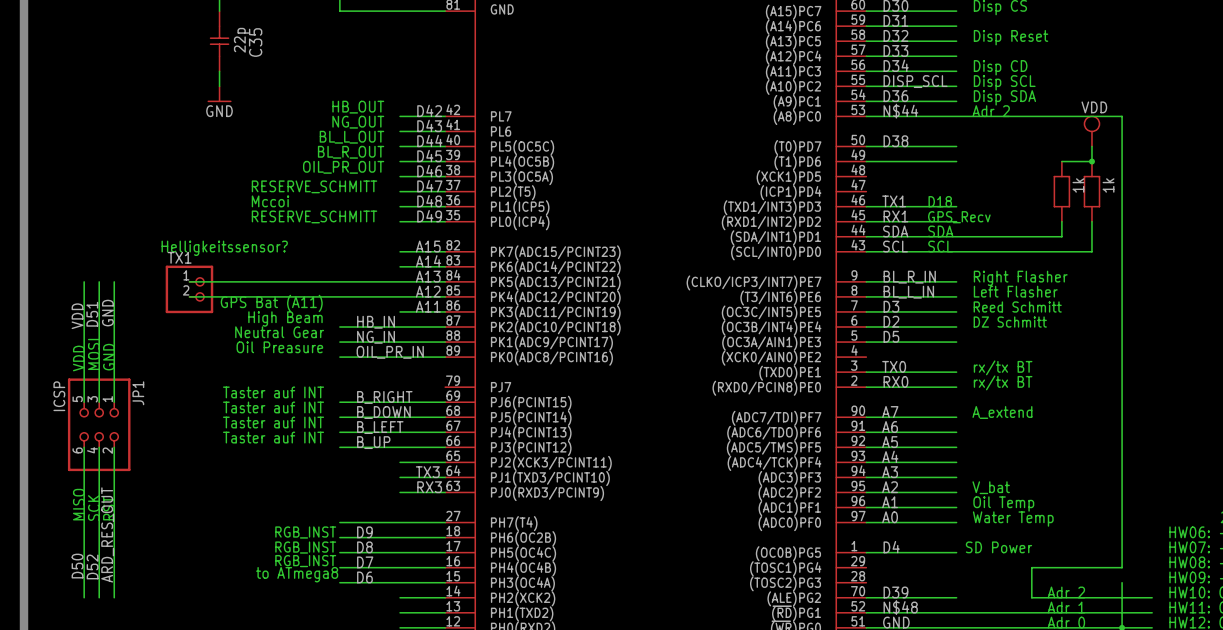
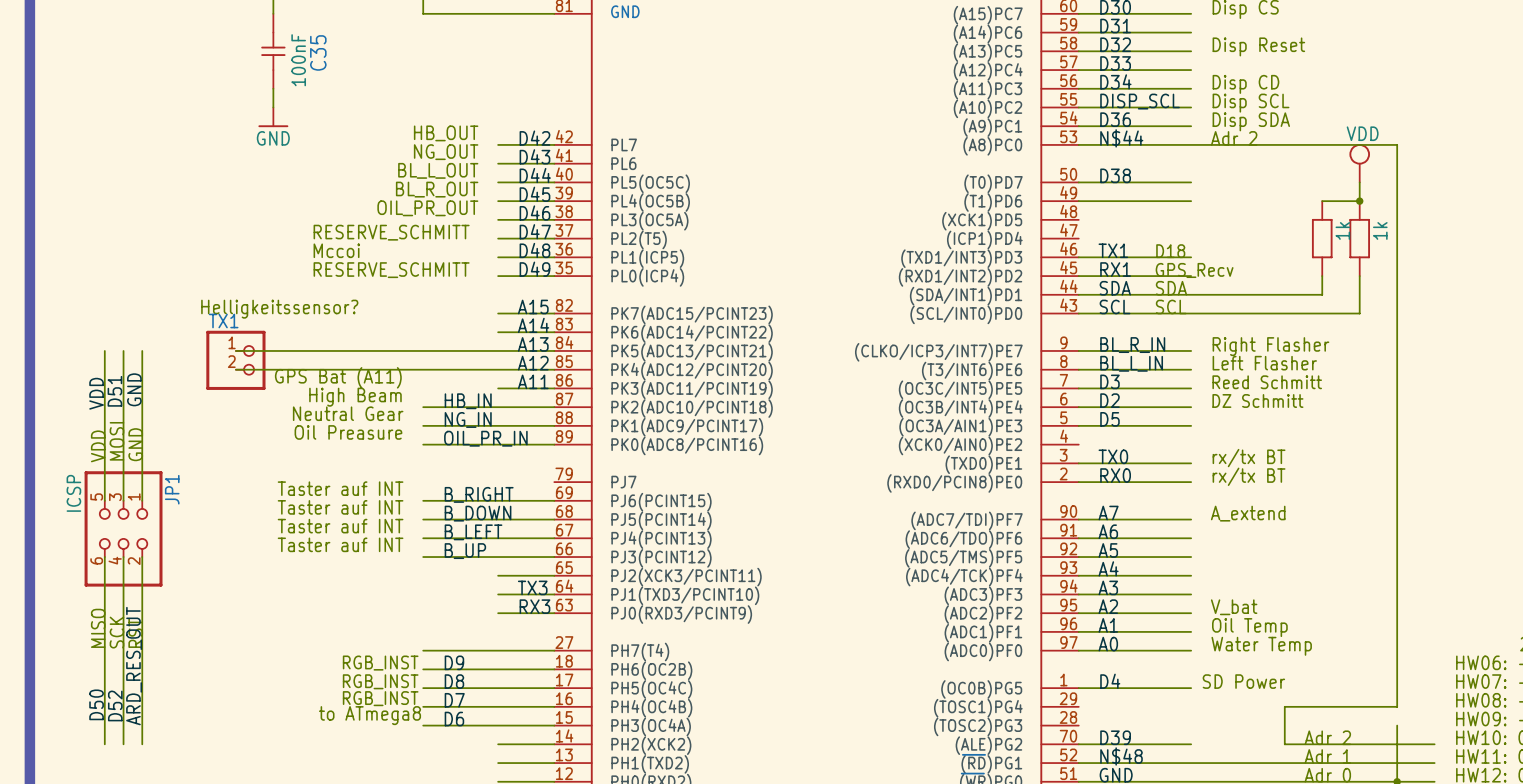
C35 value: 22p (241, 40) -> 100nF (298, 60)

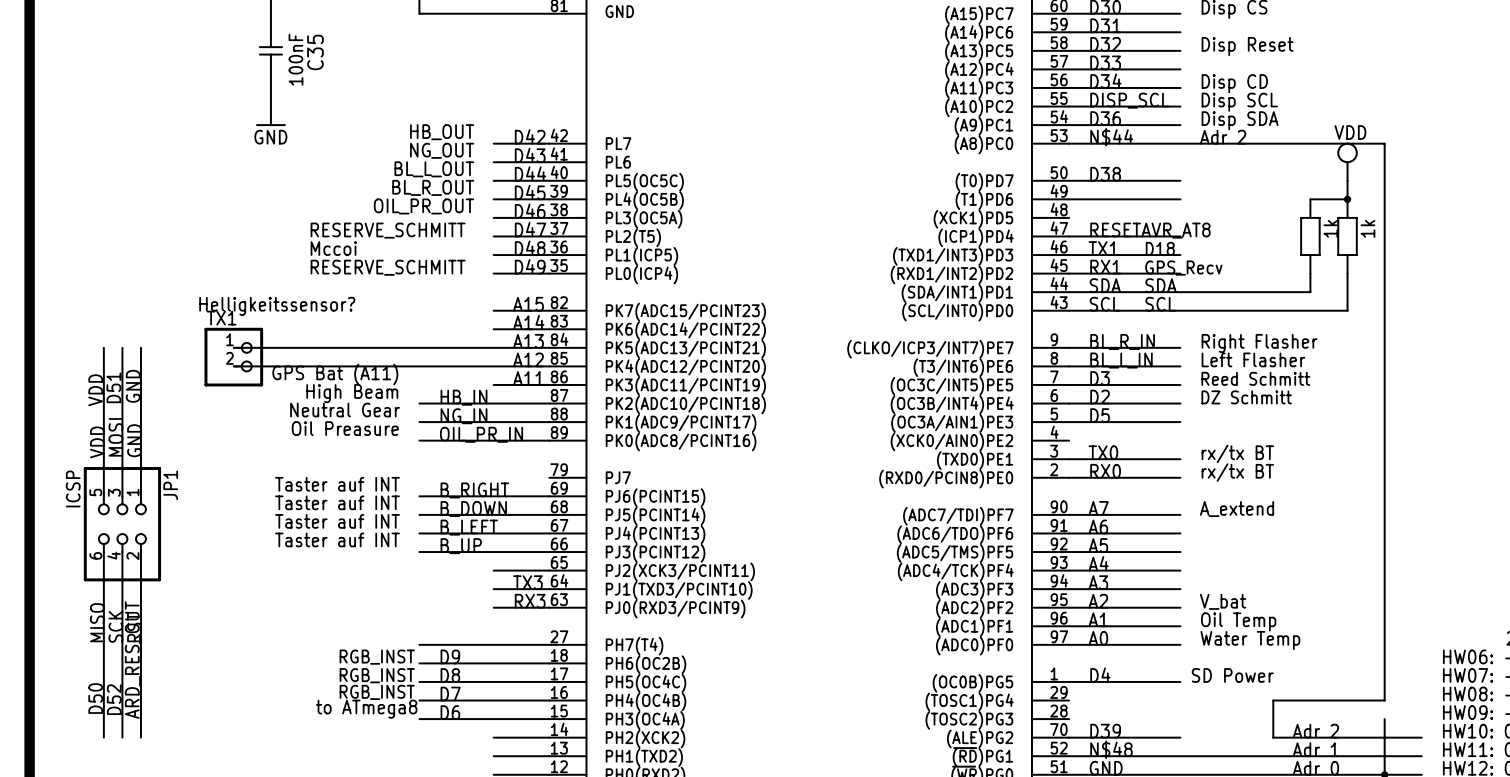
label: none -> RESETAVR_AT8 (1150, 230)
wire: none -> (1069, 236) (1180, 236)

